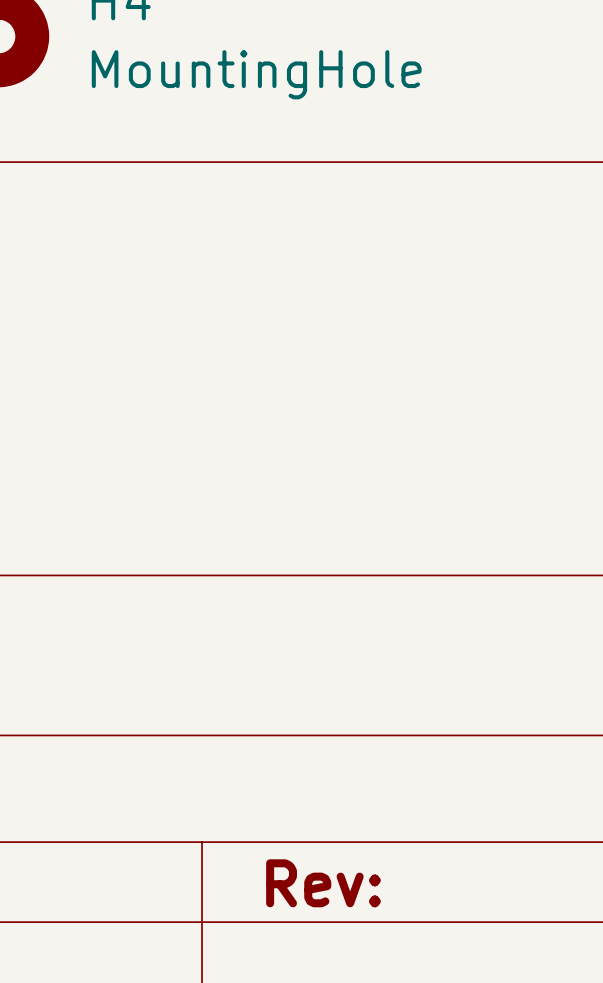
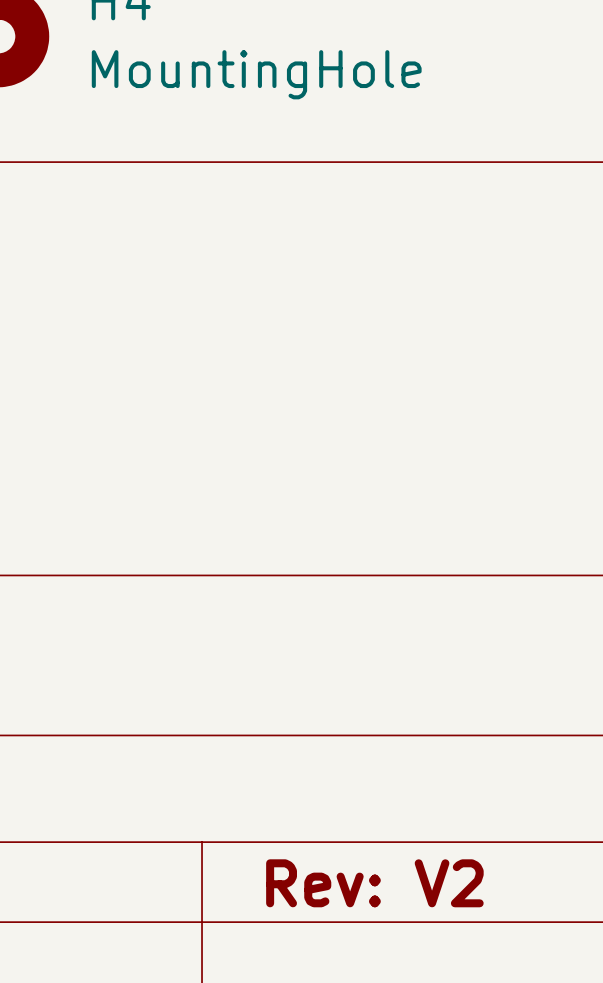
title block: Rev: (323, 883) -> Rev: V2 (374, 883)

